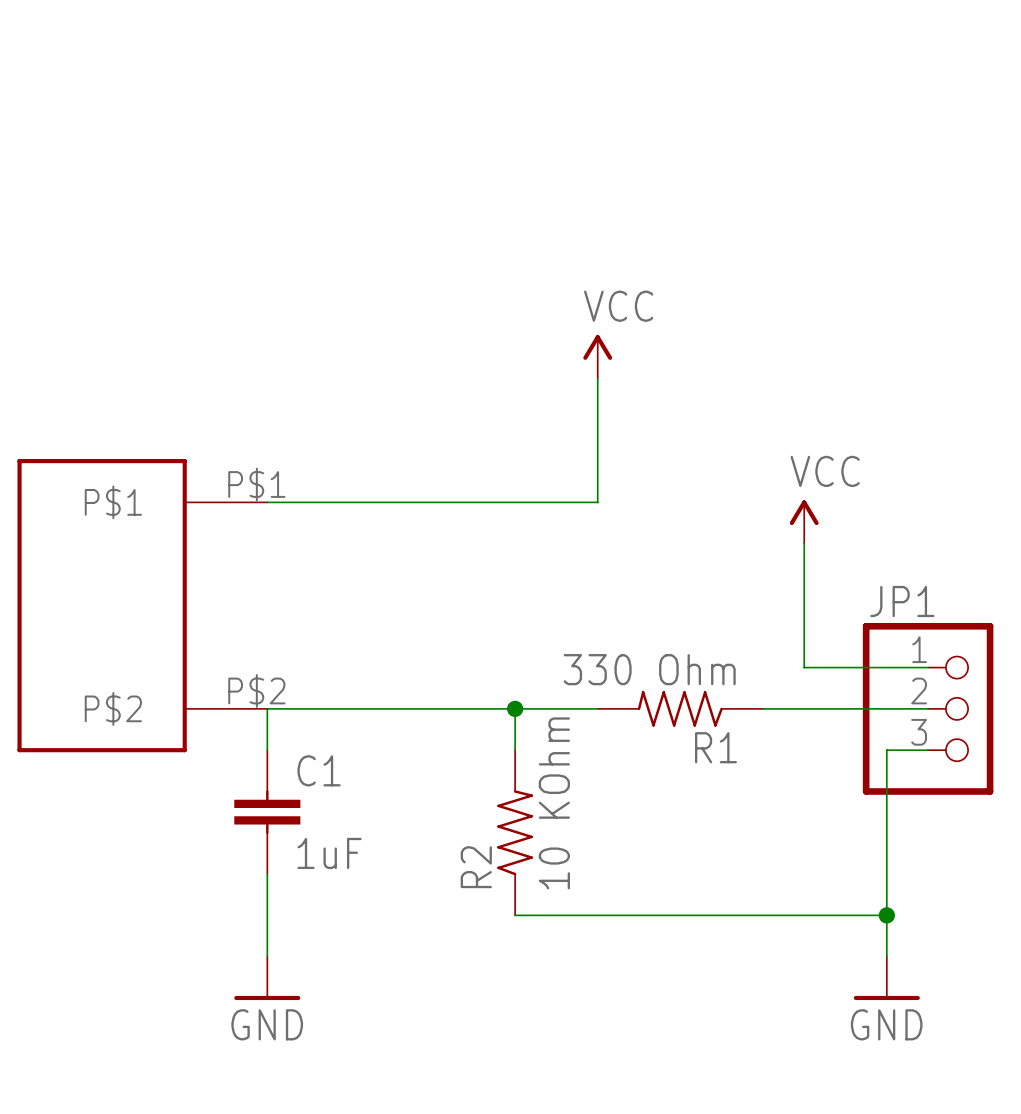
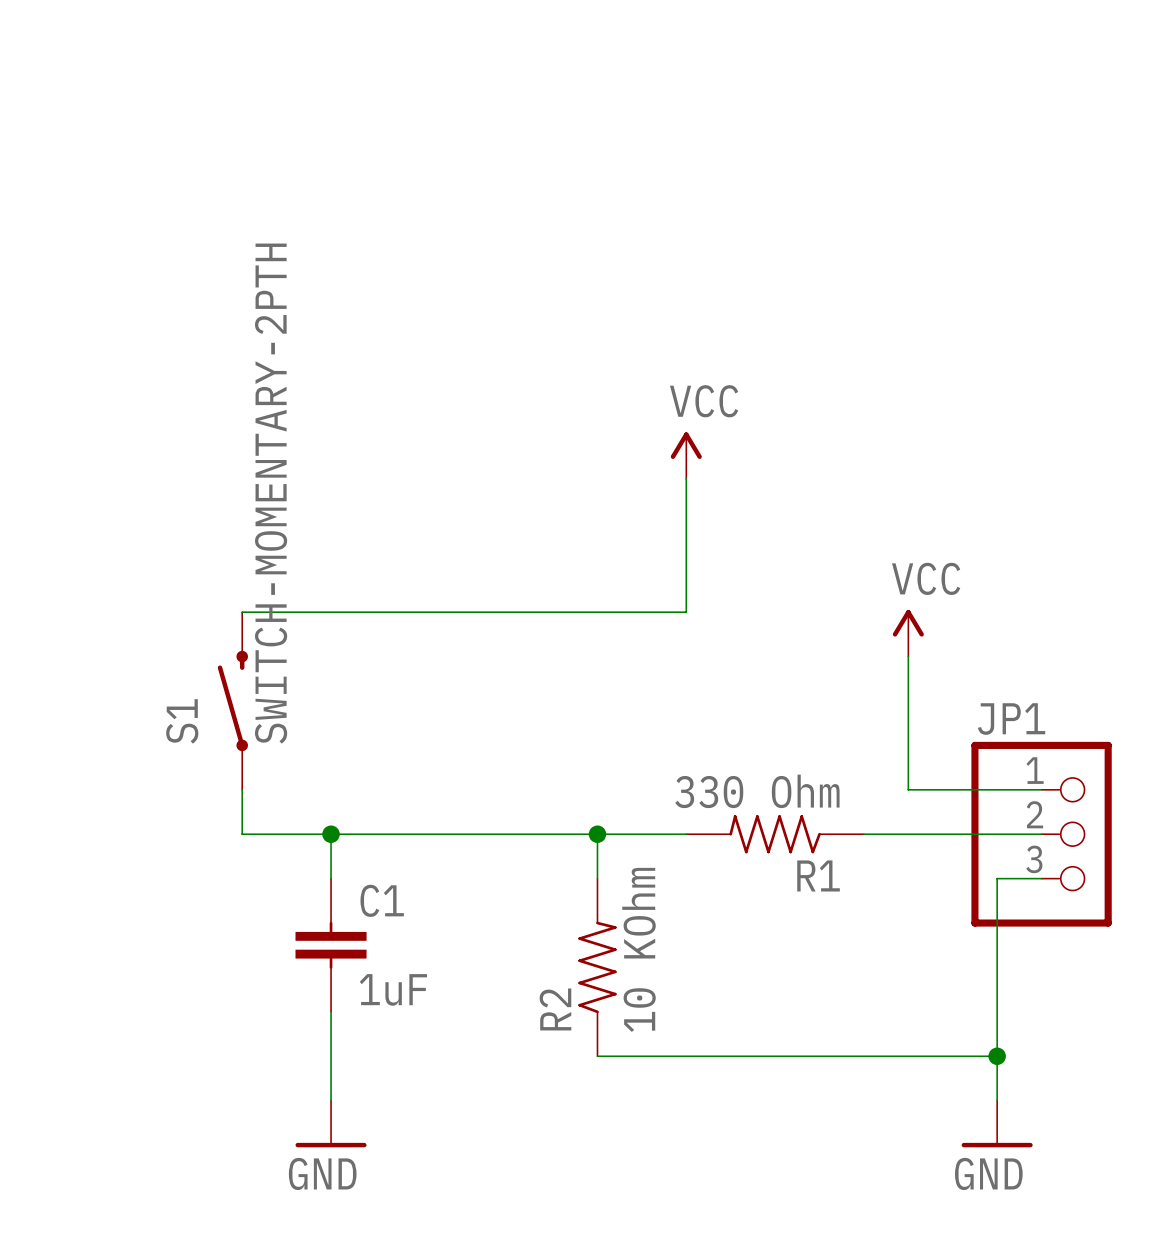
S1: none -> SWITCH-MOMENTARY-2PTH (232, 701)
part: (142, 605) -> none
junction: none -> (331, 834)

